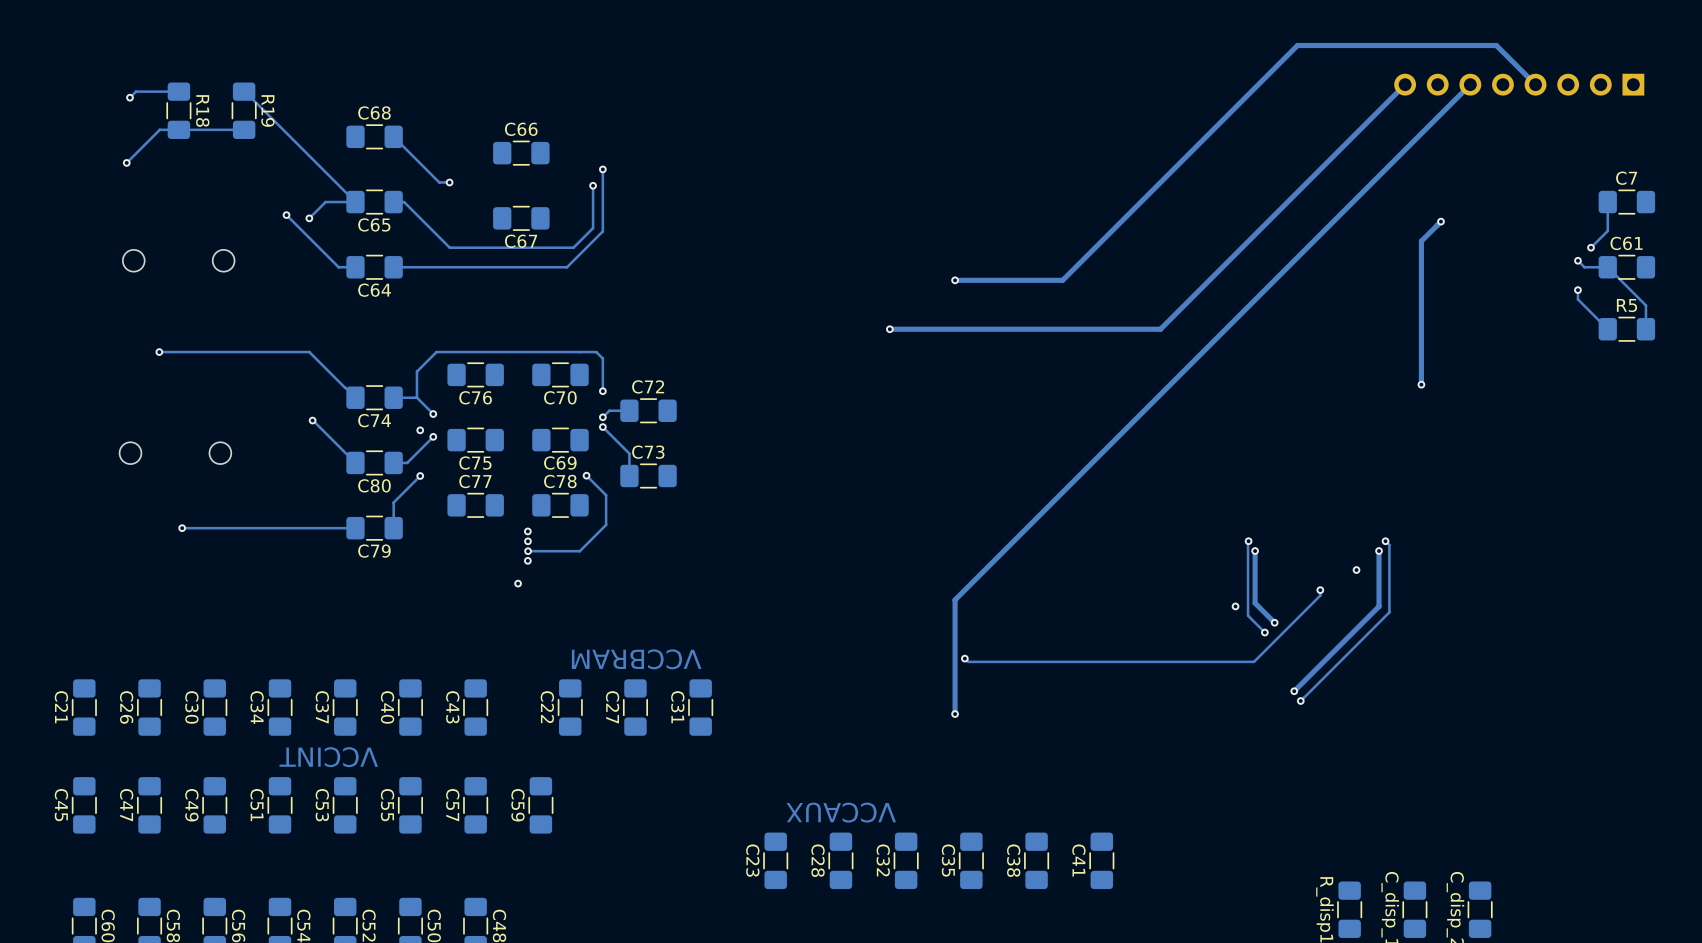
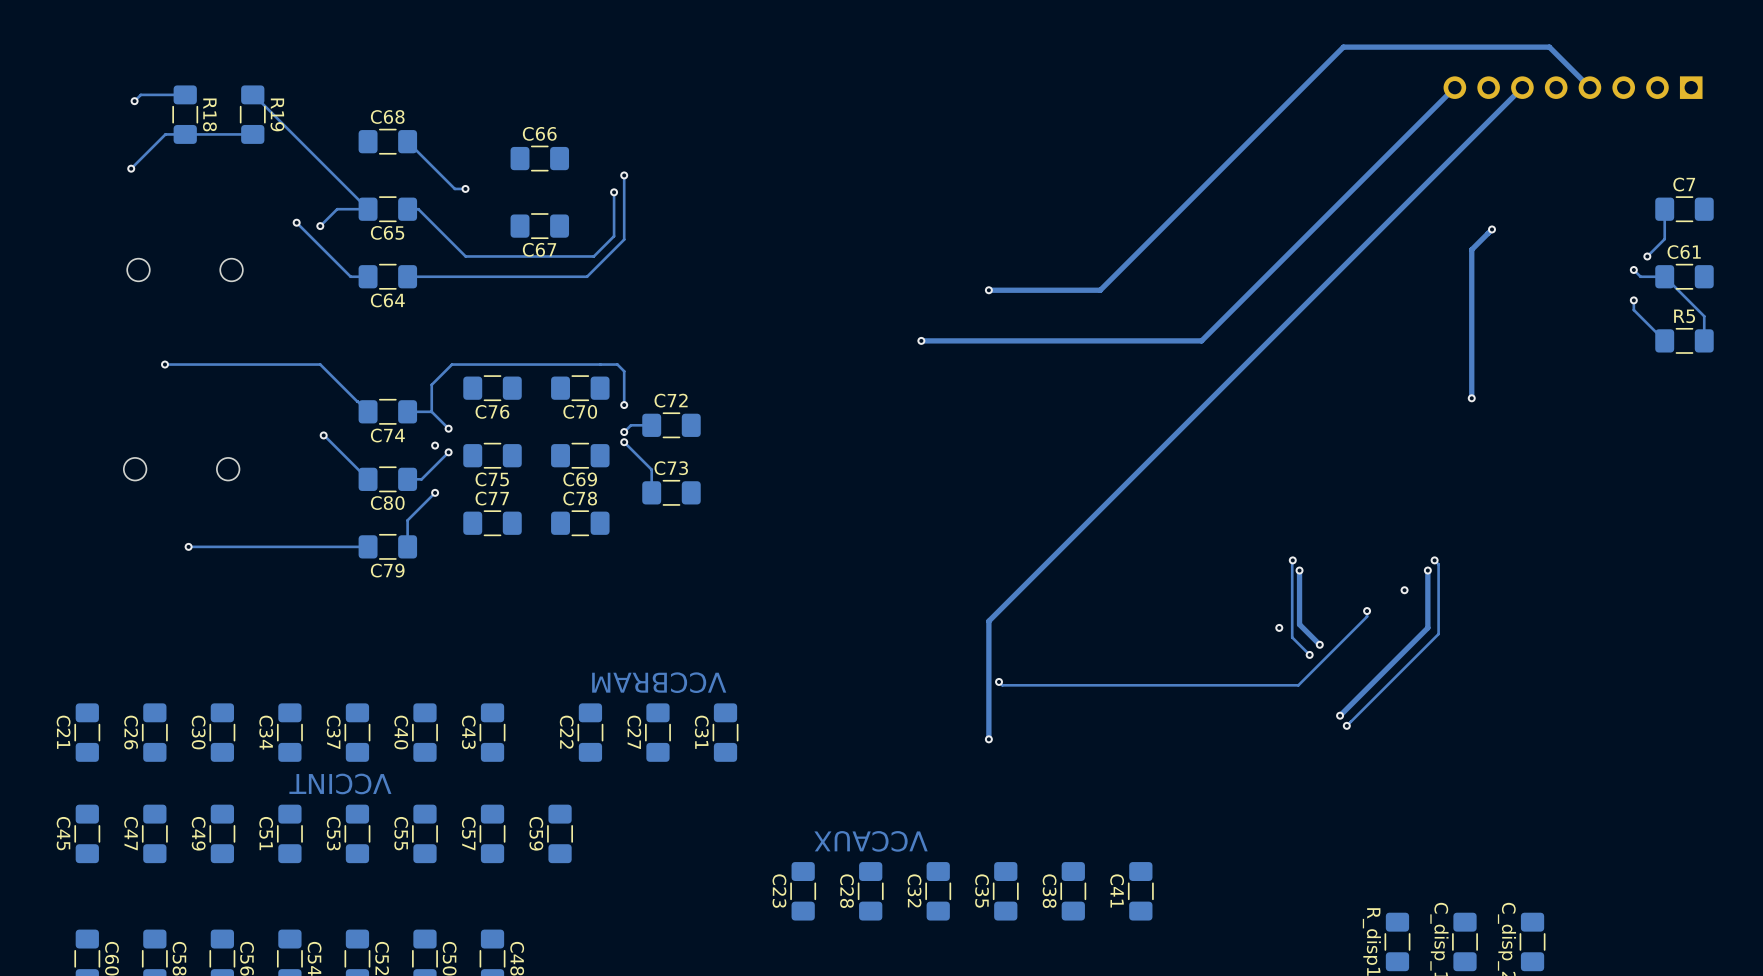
track: (586, 475) (606, 495) (606, 524) (579, 551) (528, 551) -> none
via: (586, 475) -> none
via: (527, 531) -> none
via: (527, 541) -> none
via: (528, 551) -> none
via: (527, 560) -> none
via: (518, 583) -> none

